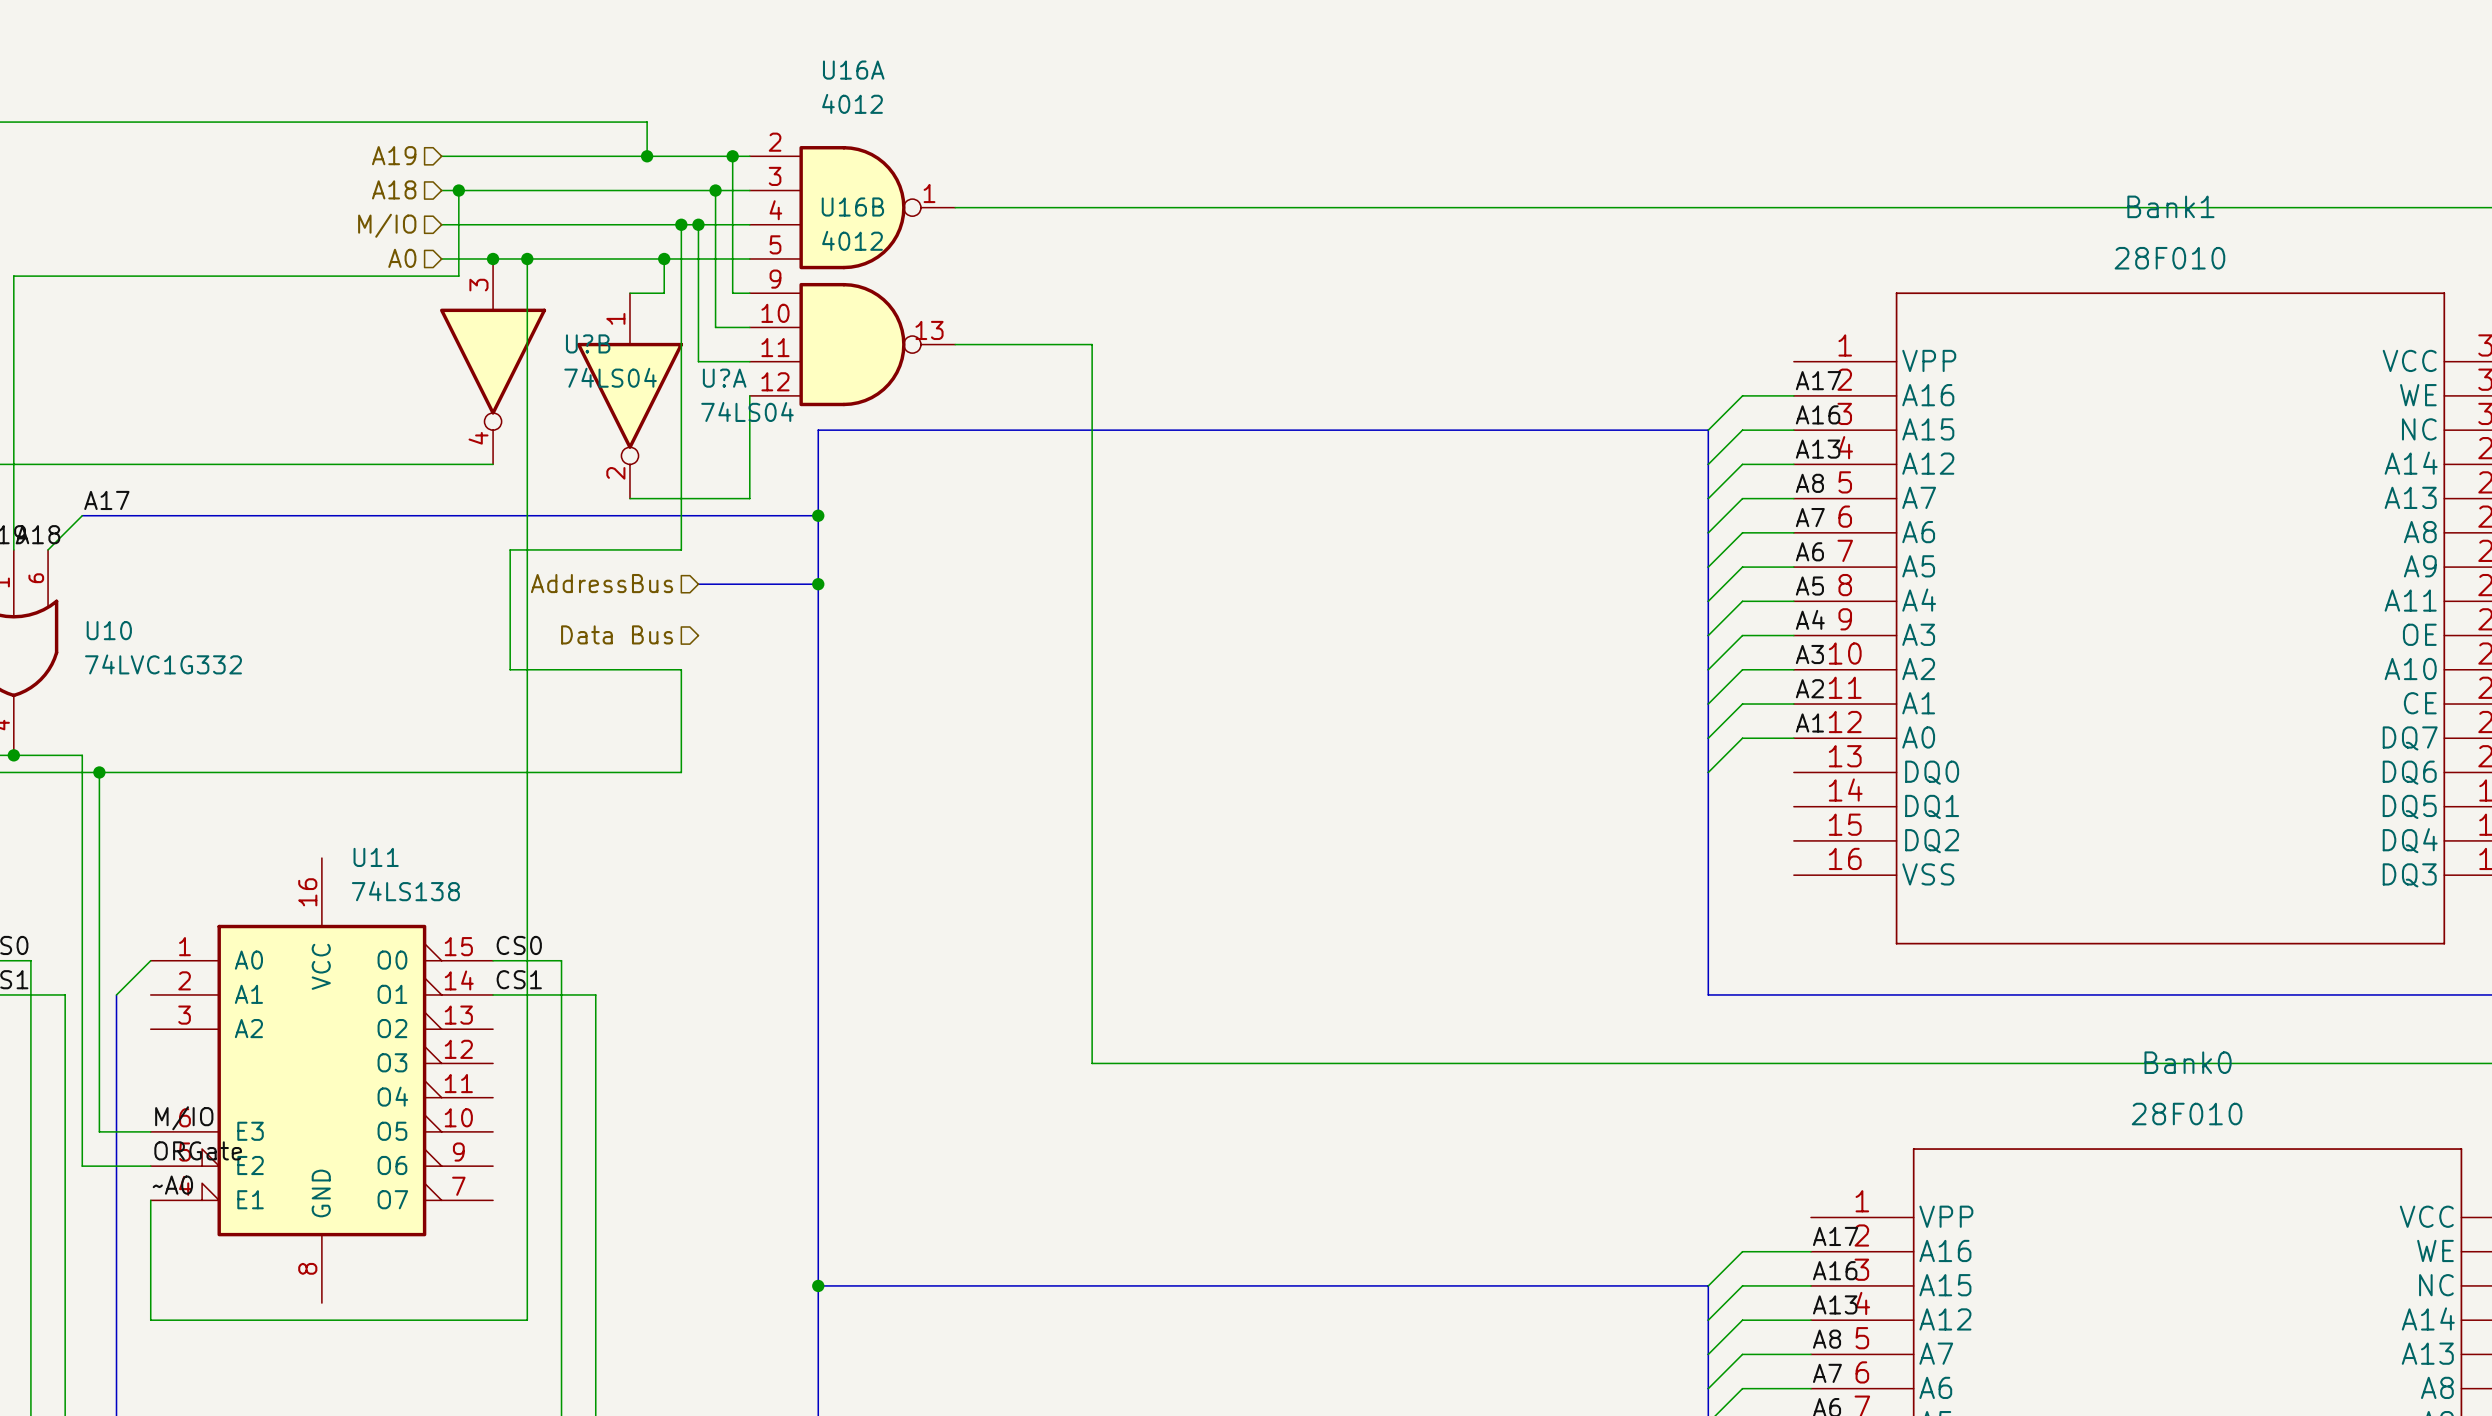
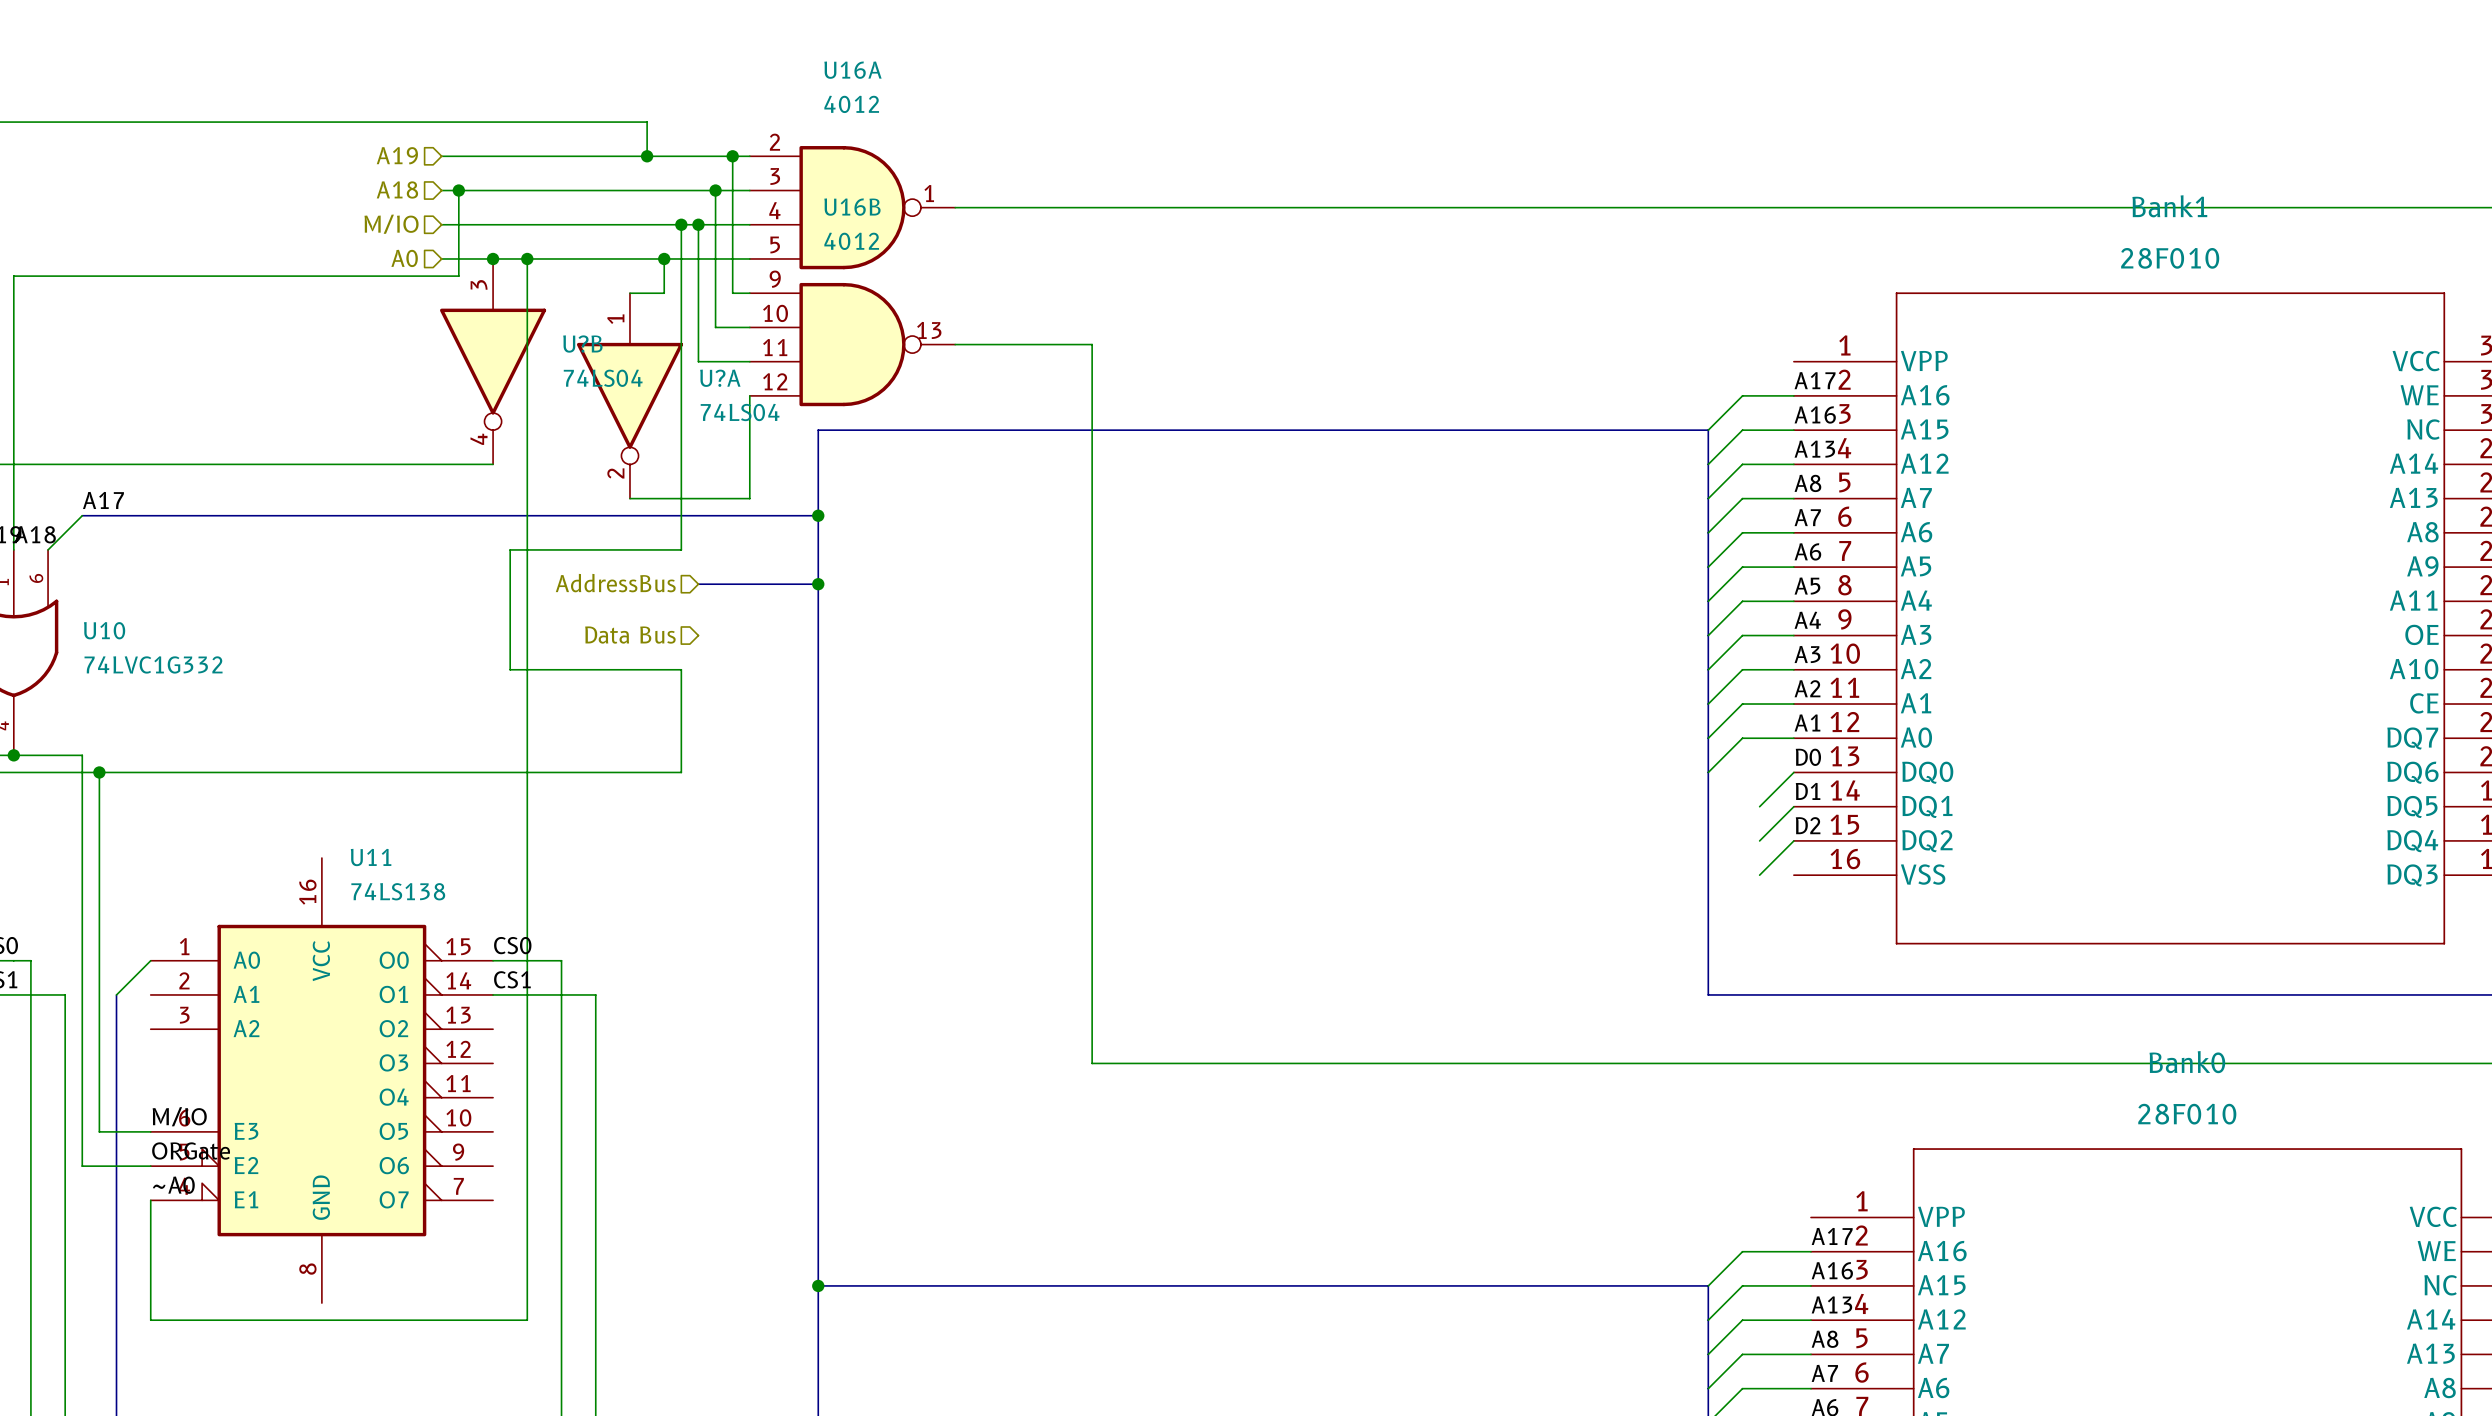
label: none -> D0 (1808, 757)
wire: none -> (1793, 772) (1759, 806)
label: none -> D1 (1808, 791)
wire: none -> (1793, 806) (1759, 840)
label: none -> D2 (1808, 825)
wire: none -> (1793, 840) (1759, 875)

